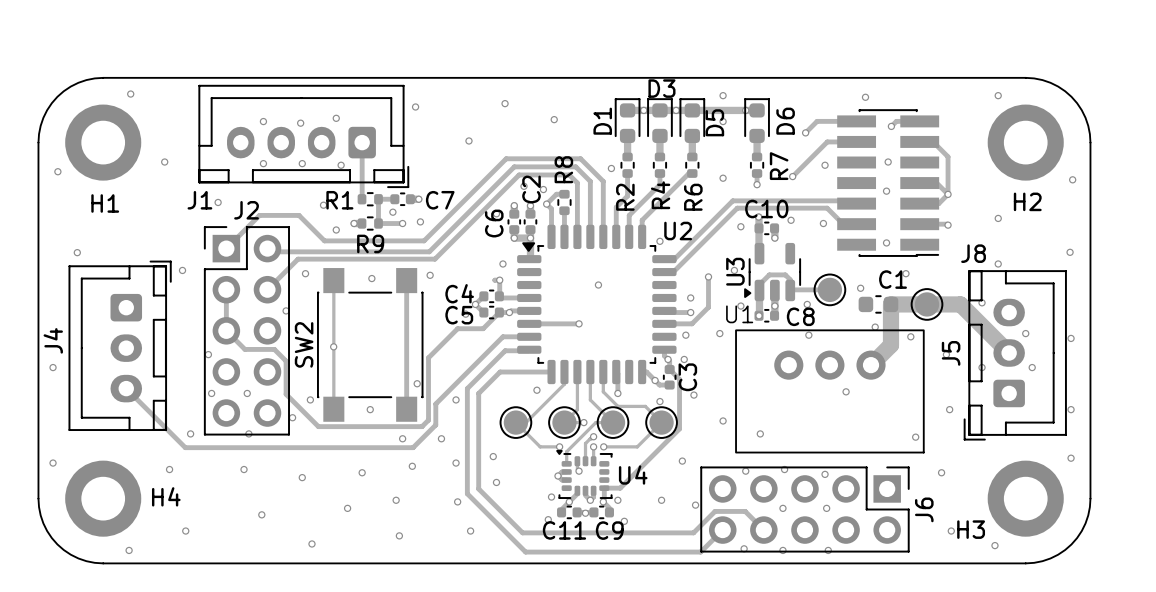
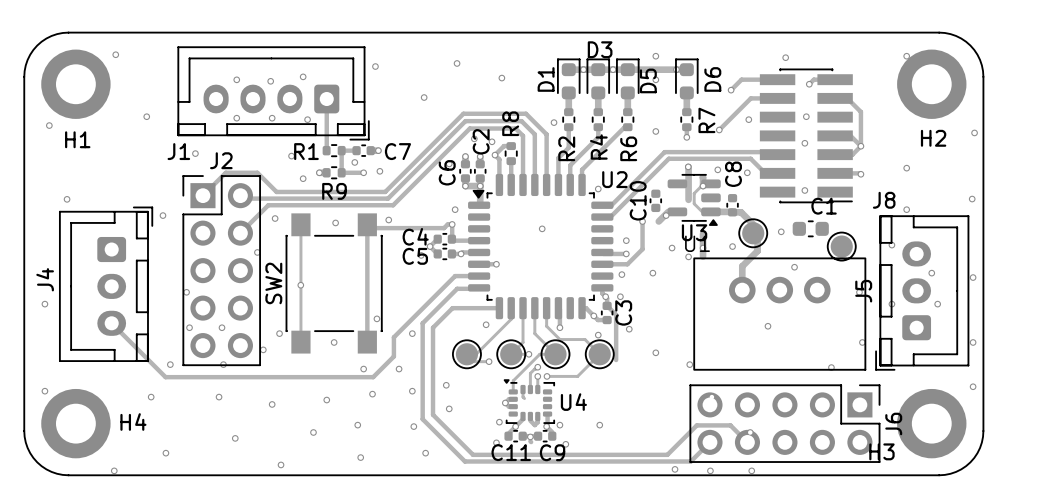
board edge: (103, 77) (1025, 77) (1050, 82) (1065, 91) (1077, 103) (1085, 117) (1089, 134) (1090, 498) (1085, 523) (1071, 544) (1058, 554) (1042, 561) (1025, 563) (103, 563) (78, 558) (63, 550) (51, 538) (43, 523) (39, 507) (38, 142) (43, 117) (57, 96) (78, 82) (103, 77) -> (68, 32) (51, 35) (37, 45) (27, 59) (24, 76) (24, 436) (27, 447) (33, 457) (41, 466) (51, 471) (68, 475) (939, 475) (956, 471) (966, 466) (974, 457) (980, 447) (983, 431) (983, 76) (981, 65) (977, 54) (966, 41) (956, 35) (939, 32) (68, 32)
H1 position: (103, 142) -> (75, 84)
H2 position: (1025, 142) -> (931, 84)
track: (512, 158) (506, 158) (424, 240) (324, 240) (299, 215) (259, 215) (251, 223) -> (463, 113) (385, 191) (276, 191) (257, 172) (225, 172)
via: (740, 226) -> none
C10 rotation: 0° (766, 228) -> 90° clockwise (655, 200)
C10 position: (766, 228) -> (655, 200)
track: none -> (710, 183) (703, 183) (694, 193) (694, 203) (702, 211) (741, 212) (757, 228) (757, 250) (742, 266) (742, 290)
track: none -> (668, 211) (658, 221)
U3 rotation: 0° (772, 272) -> 90° counterclockwise (694, 199)
via: (905, 273) -> none
track: none -> (447, 224) (444, 228) (370, 228) (367, 224)
track: (226, 289) (226, 330) (244, 349) (274, 349) (286, 361) (286, 394) (318, 426) (422, 426) (428, 420) (428, 357) (457, 328) (483, 328) (499, 312) -> none
track: (829, 289) (790, 290) (790, 279) (785, 274) (769, 274) (759, 284) (759, 315) -> none
C1 position: (878, 304) -> (810, 228)
C8 rotation: 0° (766, 315) -> 90° clockwise (732, 205)
C8 position: (766, 315) -> (732, 205)
C8 name position: C8 (800, 316) -> C8 (733, 174)
track: (548, 323) (579, 323) -> none
via position: (579, 323) -> (496, 264)
via: (808, 335) -> none
via: (910, 336) -> none
track: (1009, 352) (960, 304) (890, 304) (890, 345) (871, 365) -> none
U1 position: (829, 391) -> (779, 314)
track: (679, 428) (620, 488) (604, 488) -> none
track: (524, 430) (540, 446) (559, 446) -> (474, 361) (489, 361)
via position: (559, 446) -> (489, 361)
via: (682, 461) -> none
via: (579, 471) -> none
via: (745, 471) -> none
via: (941, 472) -> none
via: (825, 474) -> none
H4 position: (103, 498) -> (75, 423)
via: (590, 500) -> none
via: (695, 505) -> none
via: (782, 508) -> none
J6 position: (804, 509) -> (784, 423)
track: none -> (530, 441) (531, 442)
track: (722, 530) (700, 552) (525, 552) (513, 540) -> (709, 442) (690, 461) (464, 461)
track: (763, 530) (745, 511) (715, 511) (693, 532) -> (747, 442) (730, 425) (696, 425) (667, 454) (628, 454)
via: (951, 531) -> none
via: (994, 545) -> none

